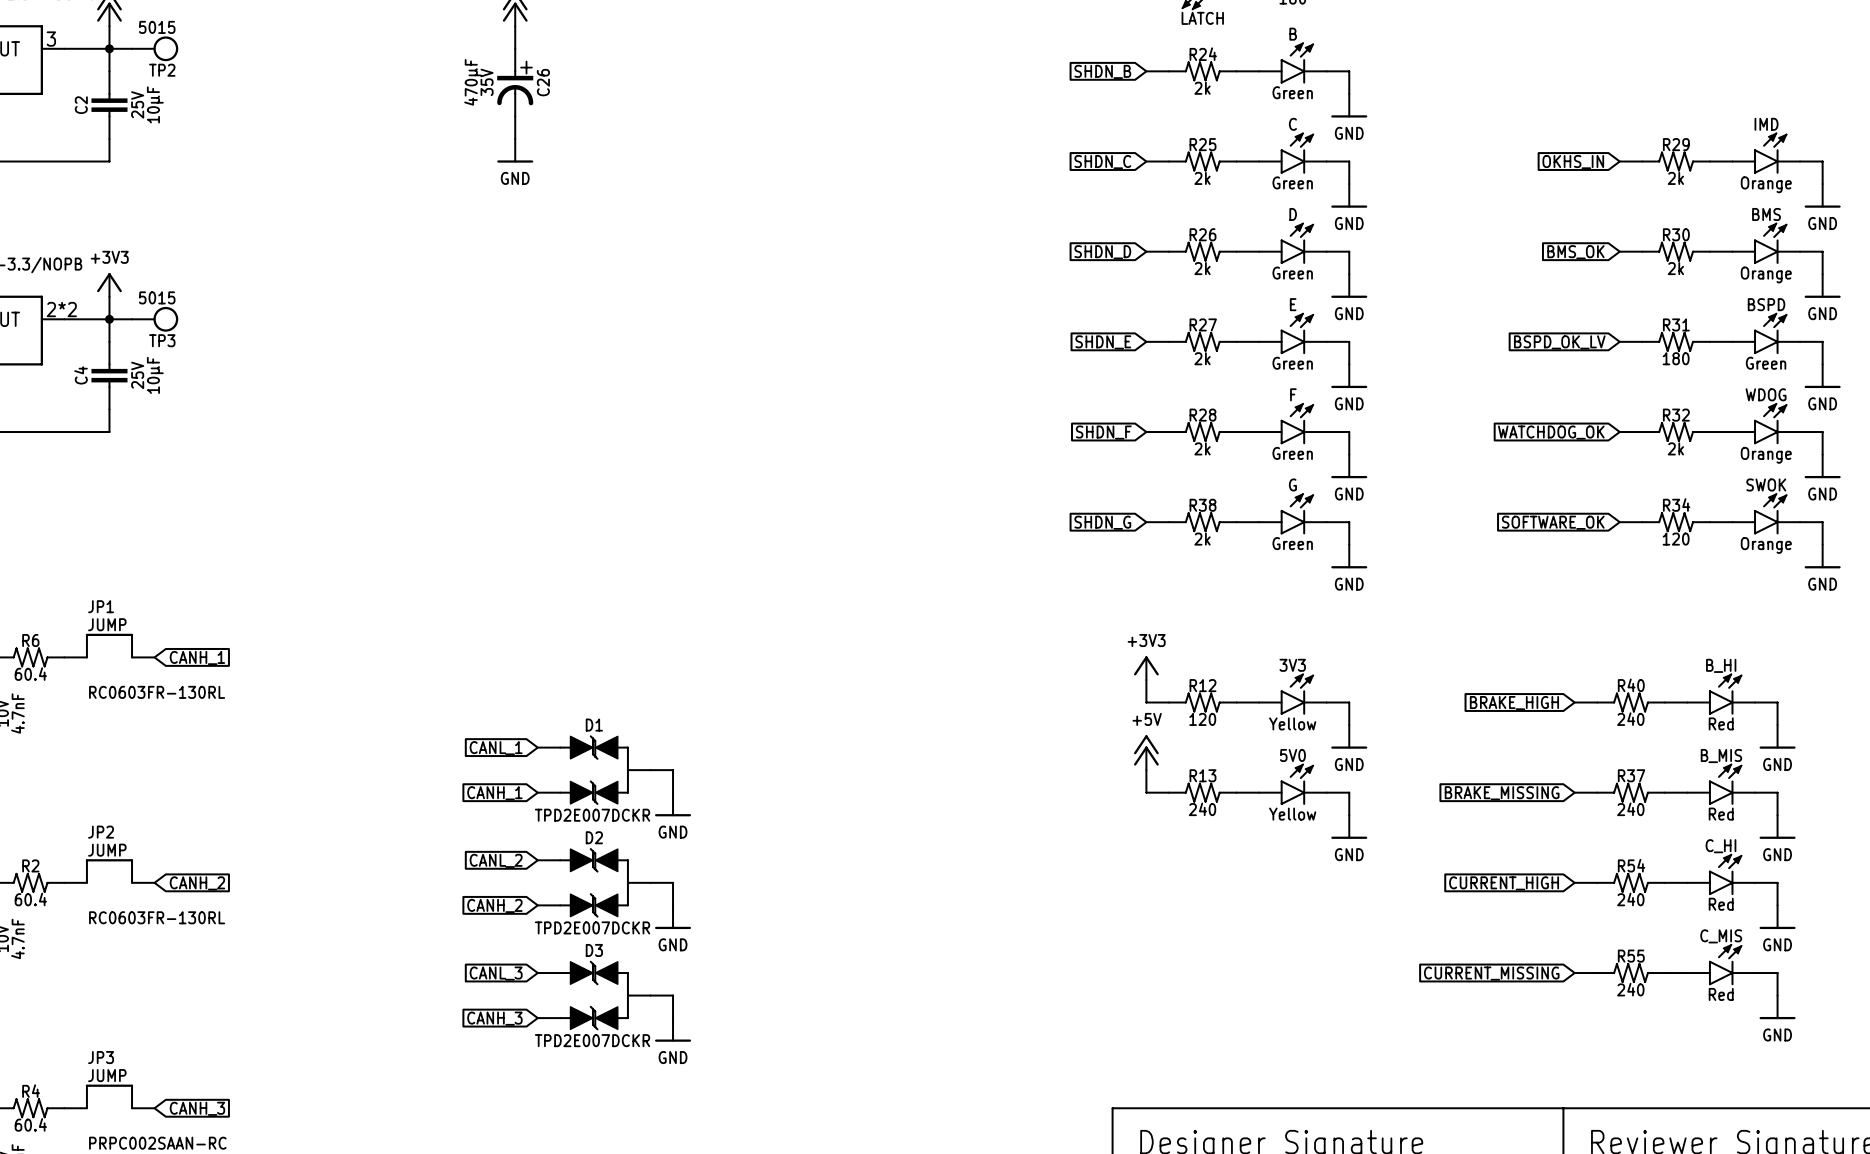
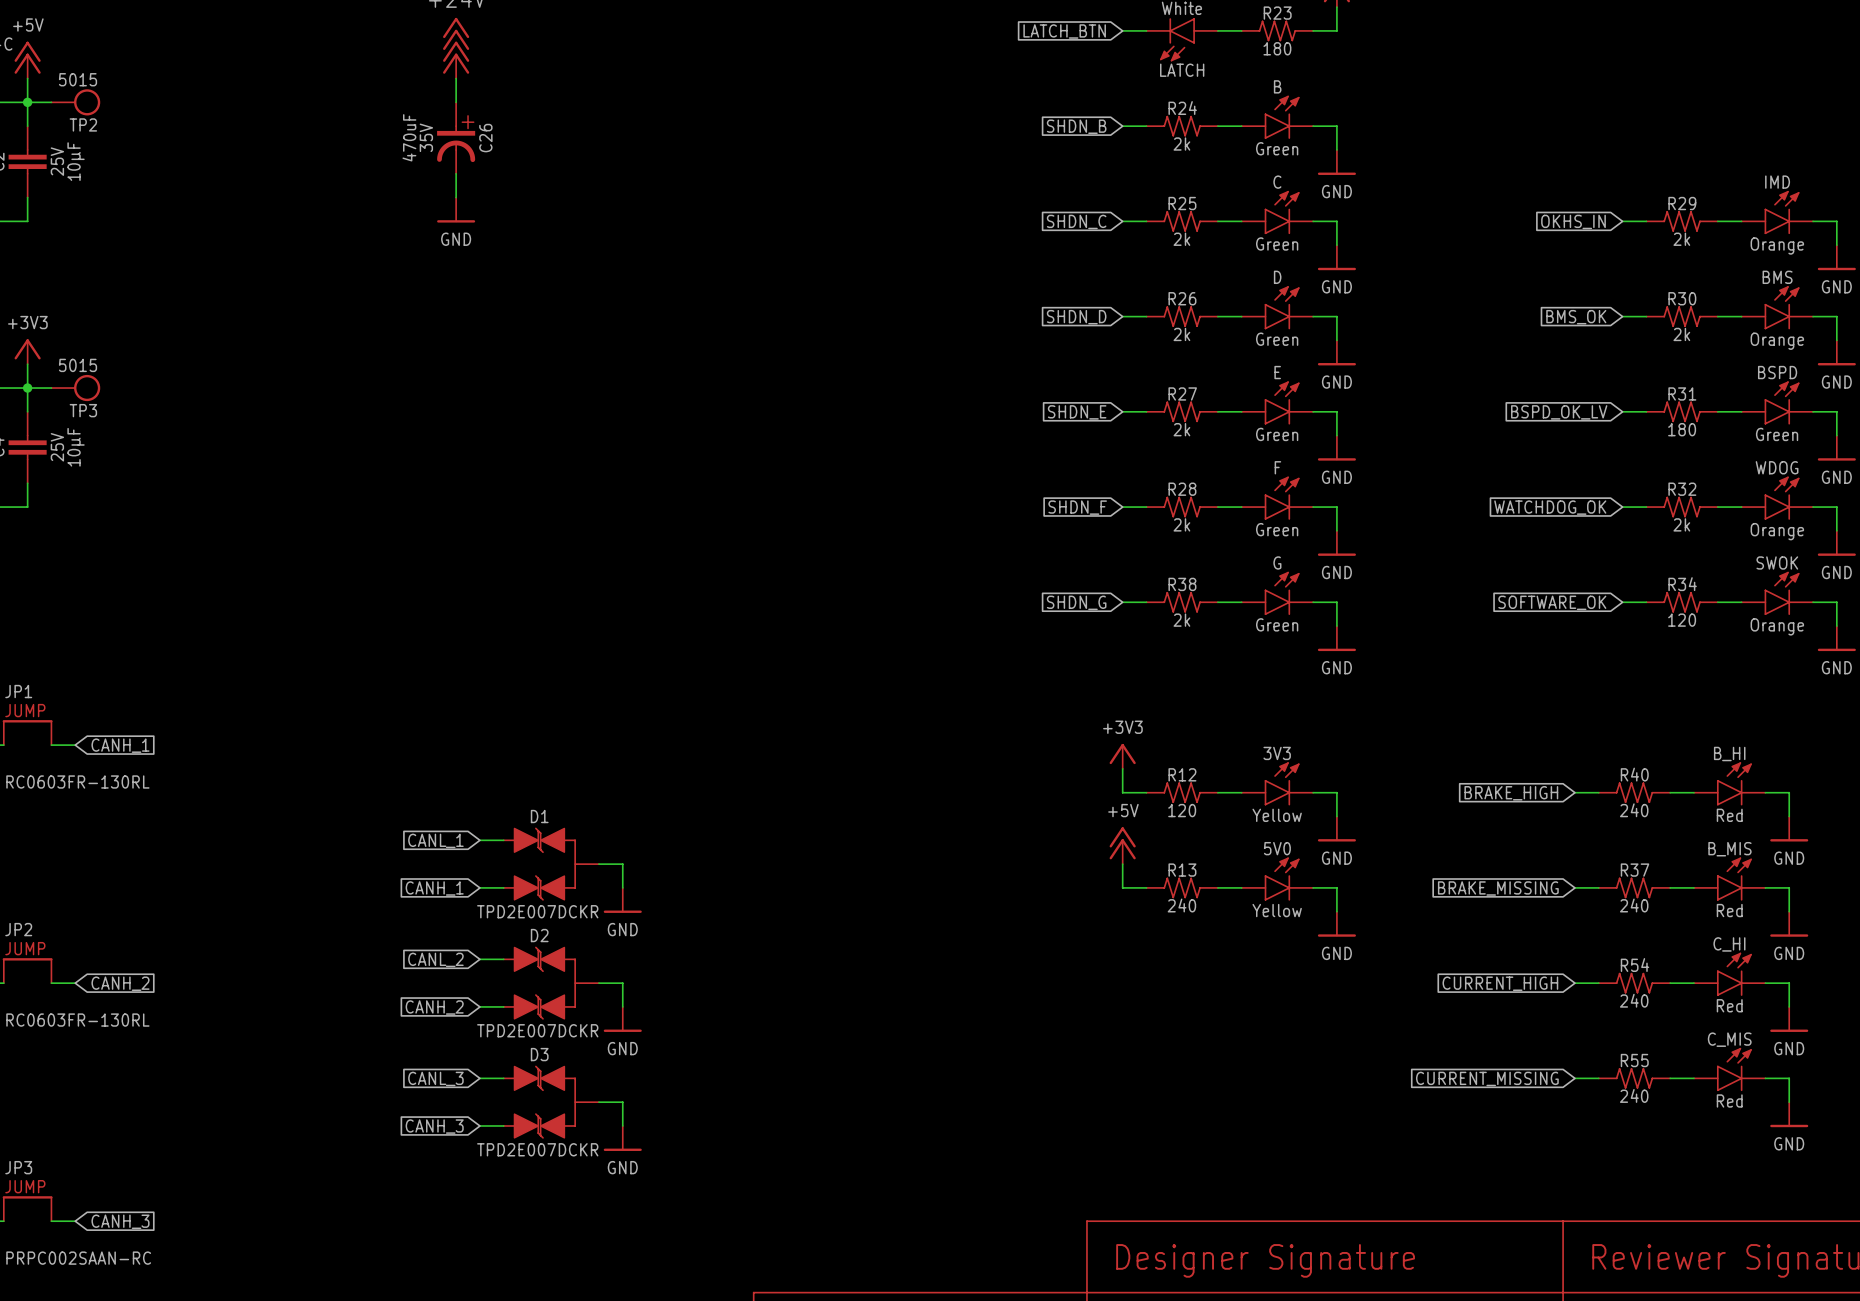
C26 text: 470µF (472, 82) -> 470uF (409, 137)

